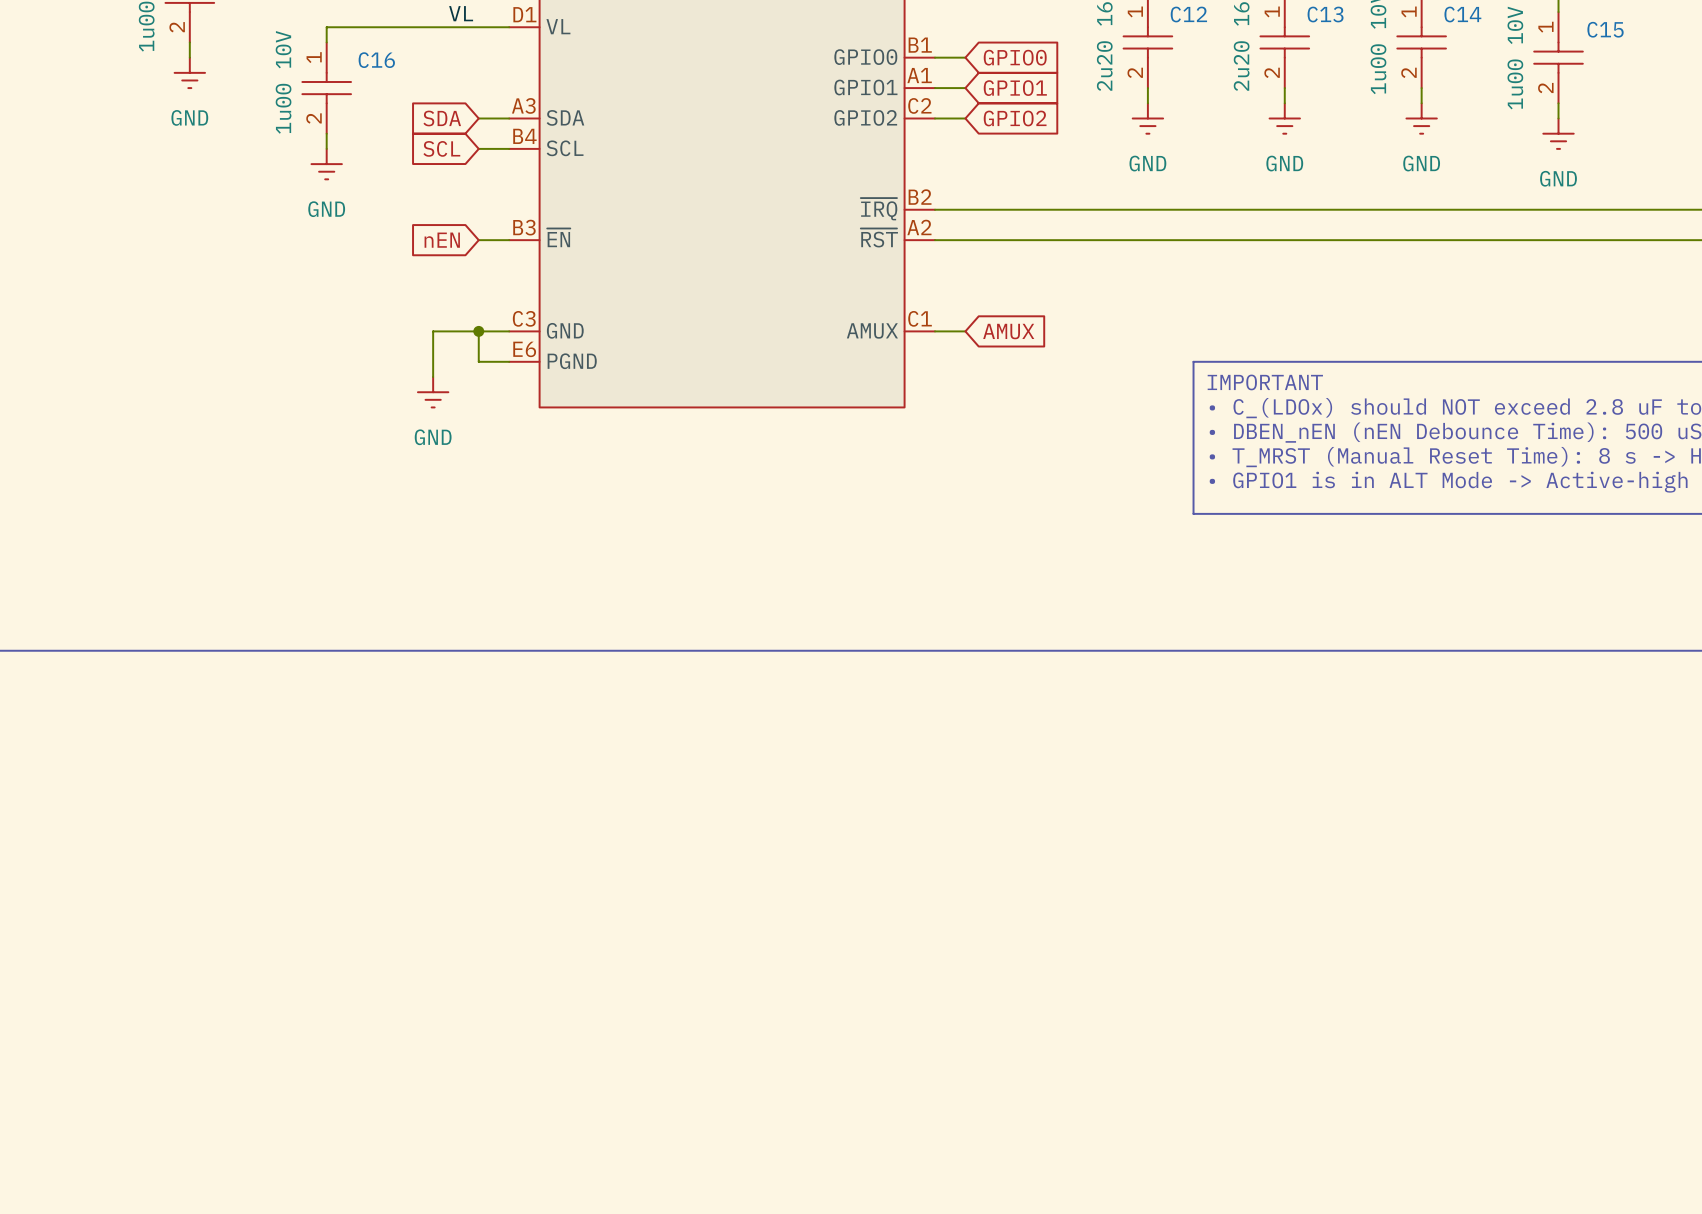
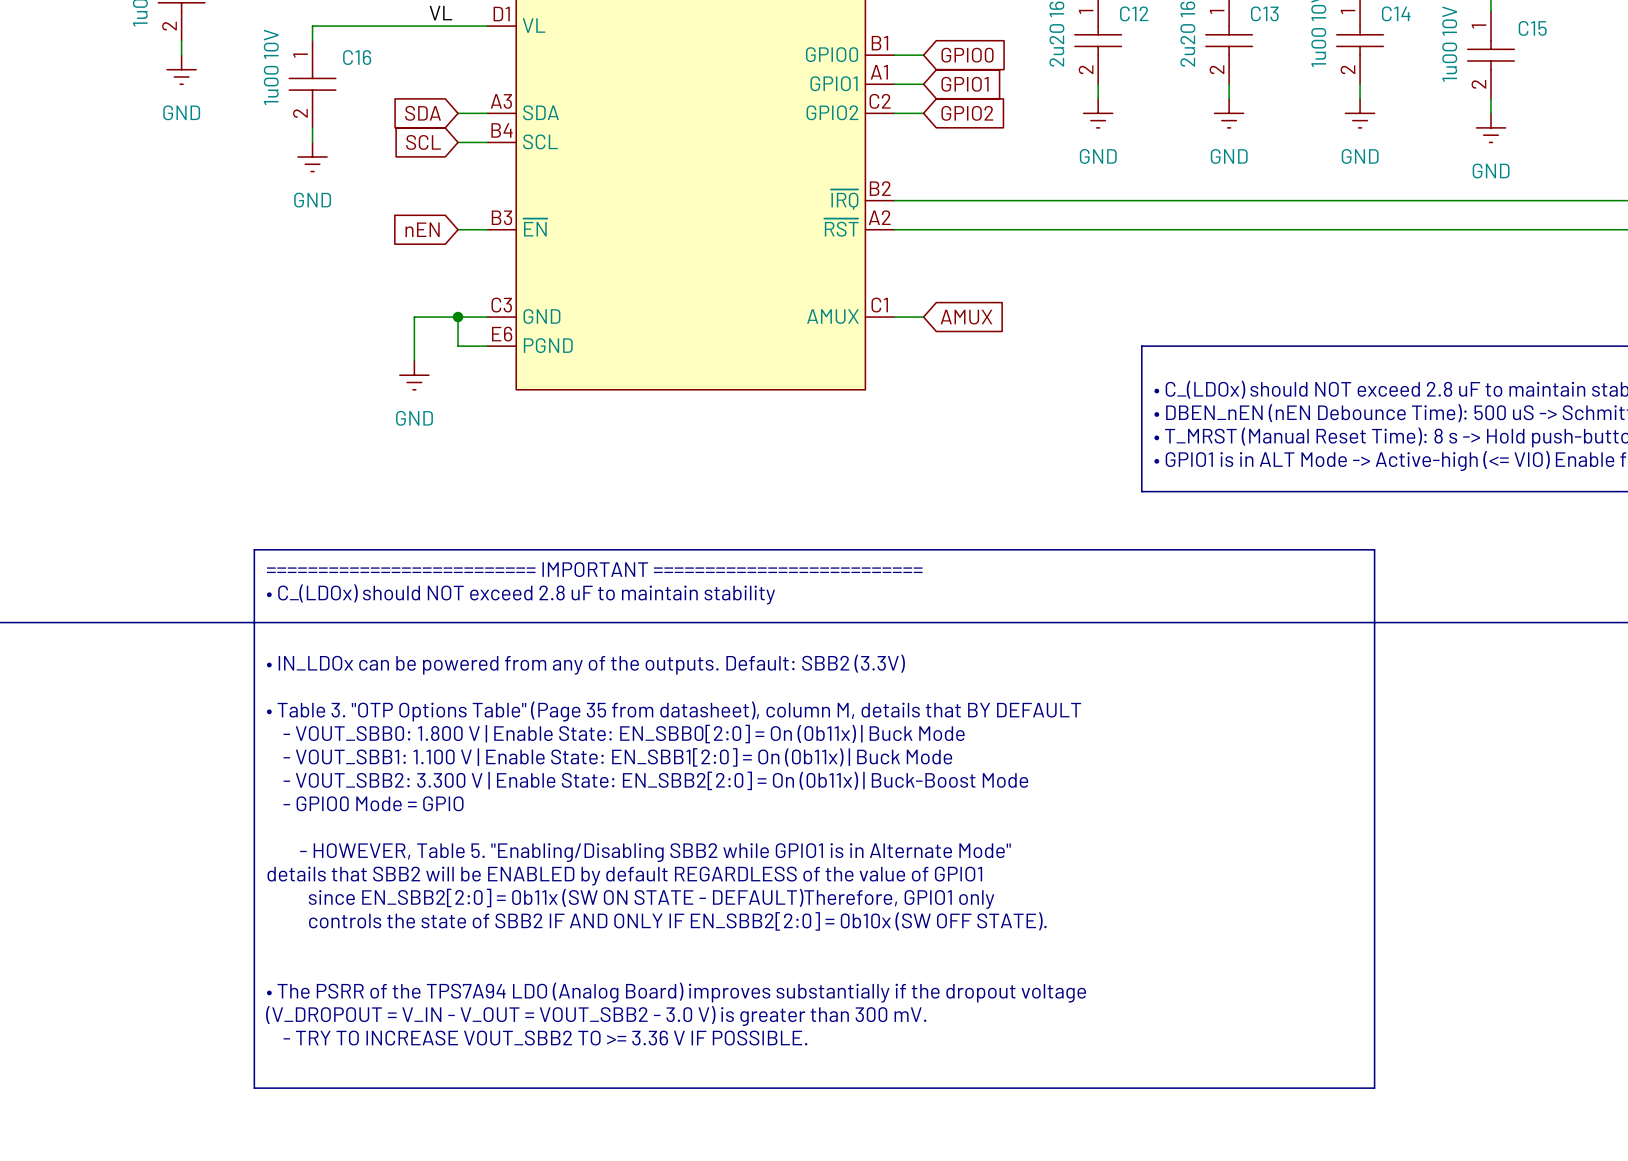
text: IMPORTANT (1265, 382) -> none
line: none -> (254, 549) (1374, 549) (1374, 1088) (254, 1088) (254, 549)
text: none -> ========================== IMPORTANT ========================== (594, 569)
text: none -> • C_(LDOx) should NOT exceed 2.8 uF to maintain stability (520, 594)
text: none -> • IN_LDOx can be powered from any of the outputs. Default: SBB2 (3.3V) (585, 664)
text: none -> • Table 3. "OTP Options Table" (Page 35 from datasheet), column M, details that BY DEFAULT (674, 711)
text: none -> - VOUT_SBB0: 1.800 V | Enable State: EN_SBB0[2:0] = On (0b11x) | Buck Mode (624, 734)
text: none -> - VOUT_SBB1: 1.100 V | Enable State: EN_SBB1[2:0] = On (0b11x) | Buck Mode (617, 757)
text: none -> - VOUT_SBB2: 3.300 V | Enable State: EN_SBB2[2:0] = On (0b11x) | Buck-Boost Mode (655, 780)
text: none -> - GPIO0 Mode = GPIO (373, 803)
text: none -> - HOWEVER, Table 5. "Enabling/Disabling SBB2 while GPIO1 is in Alternate Mode" (655, 852)
text: none -> details that SBB2 will be ENABLED by default REGARDLESS of the value of GPIO1 (624, 876)
text: none -> since EN_SBB2[2:0] = 0b11x (SW ON STATE - DEFAULT)Therefore, GPIO1 only (651, 898)
text: none -> controls the state of SBB2 IF AND ONLY IF EN_SBB2[2:0] = 0b10x (SW OFF STATE). (677, 921)
text: none -> • The PSRR of the TPS7A94 LDO (Analog Board) improves substantially if the dropout voltage (676, 992)
text: none -> (V_DROPOUT = V_IN - V_OUT = VOUT_SBB2 - 3.0 V) is greater than 300 mV. (596, 1016)
text: none -> - TRY TO INCREASE VOUT_SBB2 TO >= 3.36 V IF POSSIBLE. (545, 1038)

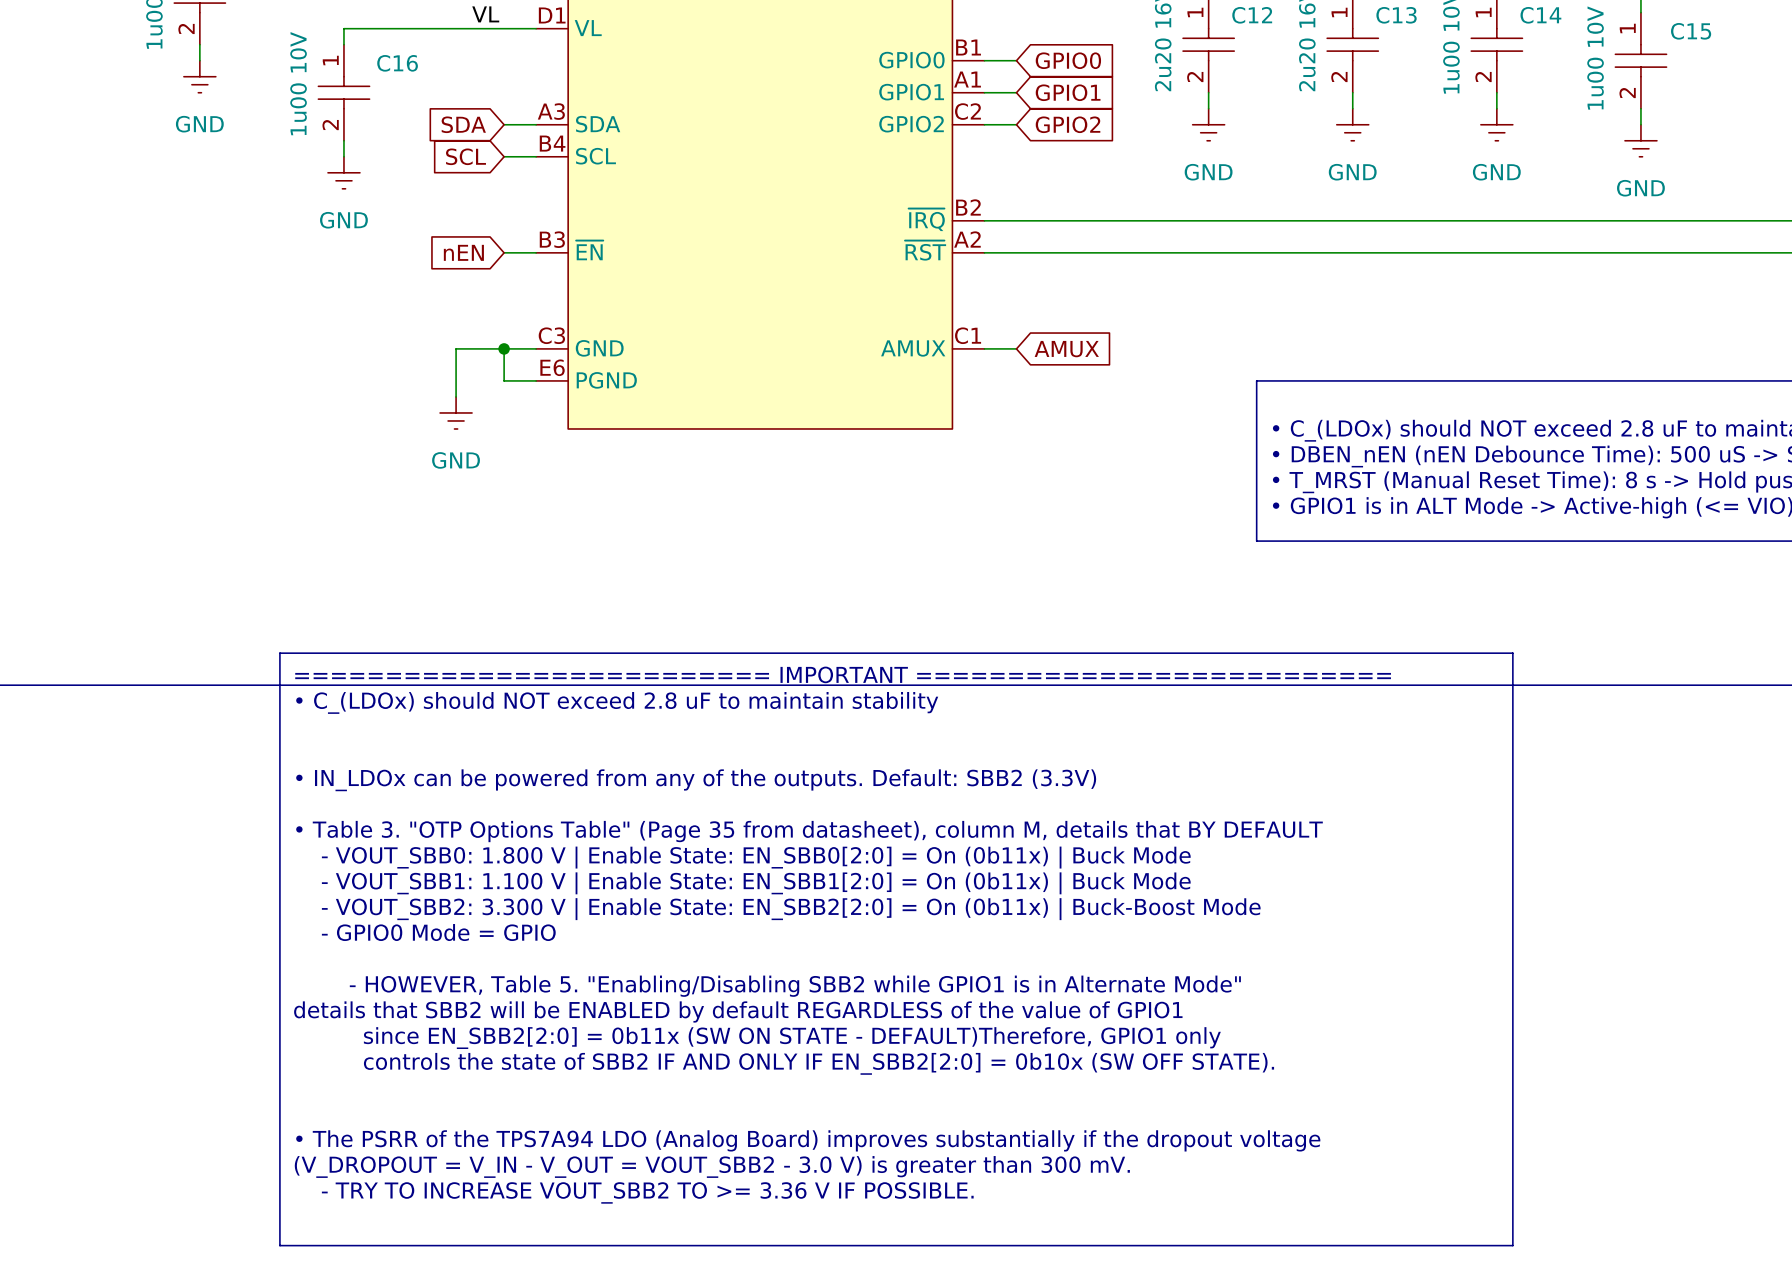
text position: ========================== IMPORTANT ========================== (594, 569) -> ========================== IMPORTANT ========================== (843, 674)
line: (254, 593) (254, 549) (1374, 549) (1374, 593) -> (279, 653) (1512, 653)
text position: • C_(LDOx) should NOT exceed 2.8 uF to maintain stability (520, 594) -> • C_(LDOx) should NOT exceed 2.8 uF to maintain stability (617, 702)
text position: • IN_LDOx can be powered from any of the outputs. Default: SBB2 (3.3V) (585, 664) -> • IN_LDOx can be powered from any of the outputs. Default: SBB2 (3.3V) (696, 780)
text position: • Table 3. "OTP Options Table" (Page 35 from datasheet), column M, details that BY DEFAULT (674, 711) -> • Table 3. "OTP Options Table" (Page 35 from datasheet), column M, details that BY DEFAULT (809, 831)
text position: - VOUT_SBB0: 1.800 V | Enable State: EN_SBB0[2:0] = On (0b11x) | Buck Mode (624, 734) -> - VOUT_SBB0: 1.800 V | Enable State: EN_SBB0[2:0] = On (0b11x) | Buck Mode (756, 857)
text position: - VOUT_SBB1: 1.100 V | Enable State: EN_SBB1[2:0] = On (0b11x) | Buck Mode (617, 757) -> - VOUT_SBB1: 1.100 V | Enable State: EN_SBB1[2:0] = On (0b11x) | Buck Mode (756, 883)
text position: - VOUT_SBB2: 3.300 V | Enable State: EN_SBB2[2:0] = On (0b11x) | Buck-Boost Mode (655, 780) -> - VOUT_SBB2: 3.300 V | Enable State: EN_SBB2[2:0] = On (0b11x) | Buck-Boost Mode (791, 909)
text position: - GPIO0 Mode = GPIO (373, 803) -> - GPIO0 Mode = GPIO (438, 932)
text position: - HOWEVER, Table 5. "Enabling/Disabling SBB2 while GPIO1 is in Alternate Mode" (655, 852) -> - HOWEVER, Table 5. "Enabling/Disabling SBB2 while GPIO1 is in Alternate Mode" (795, 986)
text position: details that SBB2 will be ENABLED by default REGARDLESS of the value of GPIO1 (624, 876) -> details that SBB2 will be ENABLED by default REGARDLESS of the value of GPIO1 (738, 1011)
text position: since EN_SBB2[2:0] = 0b11x (SW ON STATE - DEFAULT)Therefore, GPIO1 only (651, 898) -> since EN_SBB2[2:0] = 0b11x (SW ON STATE - DEFAULT)Therefore, GPIO1 only (792, 1038)
text position: controls the state of SBB2 IF AND ONLY IF EN_SBB2[2:0] = 0b10x (SW OFF STATE). (677, 921) -> controls the state of SBB2 IF AND ONLY IF EN_SBB2[2:0] = 0b10x (SW OFF STATE). (818, 1063)
text position: • The PSRR of the TPS7A94 LDO (Analog Board) improves substantially if the dropout voltage (676, 992) -> • The PSRR of the TPS7A94 LDO (Analog Board) improves substantially if the dropout voltage (808, 1140)
text position: (V_DROPOUT = V_IN - V_OUT = VOUT_SBB2 - 3.0 V) is greater than 300 mV. (596, 1016) -> (V_DROPOUT = V_IN - V_OUT = VOUT_SBB2 - 3.0 V) is greater than 300 mV. (712, 1166)
text position: - TRY TO INCREASE VOUT_SBB2 TO >= 3.36 V IF POSSIBLE. (545, 1038) -> - TRY TO INCREASE VOUT_SBB2 TO >= 3.36 V IF POSSIBLE. (647, 1192)
line: (254, 1088) (1374, 1088) -> (279, 1197) (279, 1245) (1512, 1245) (1512, 1197)

